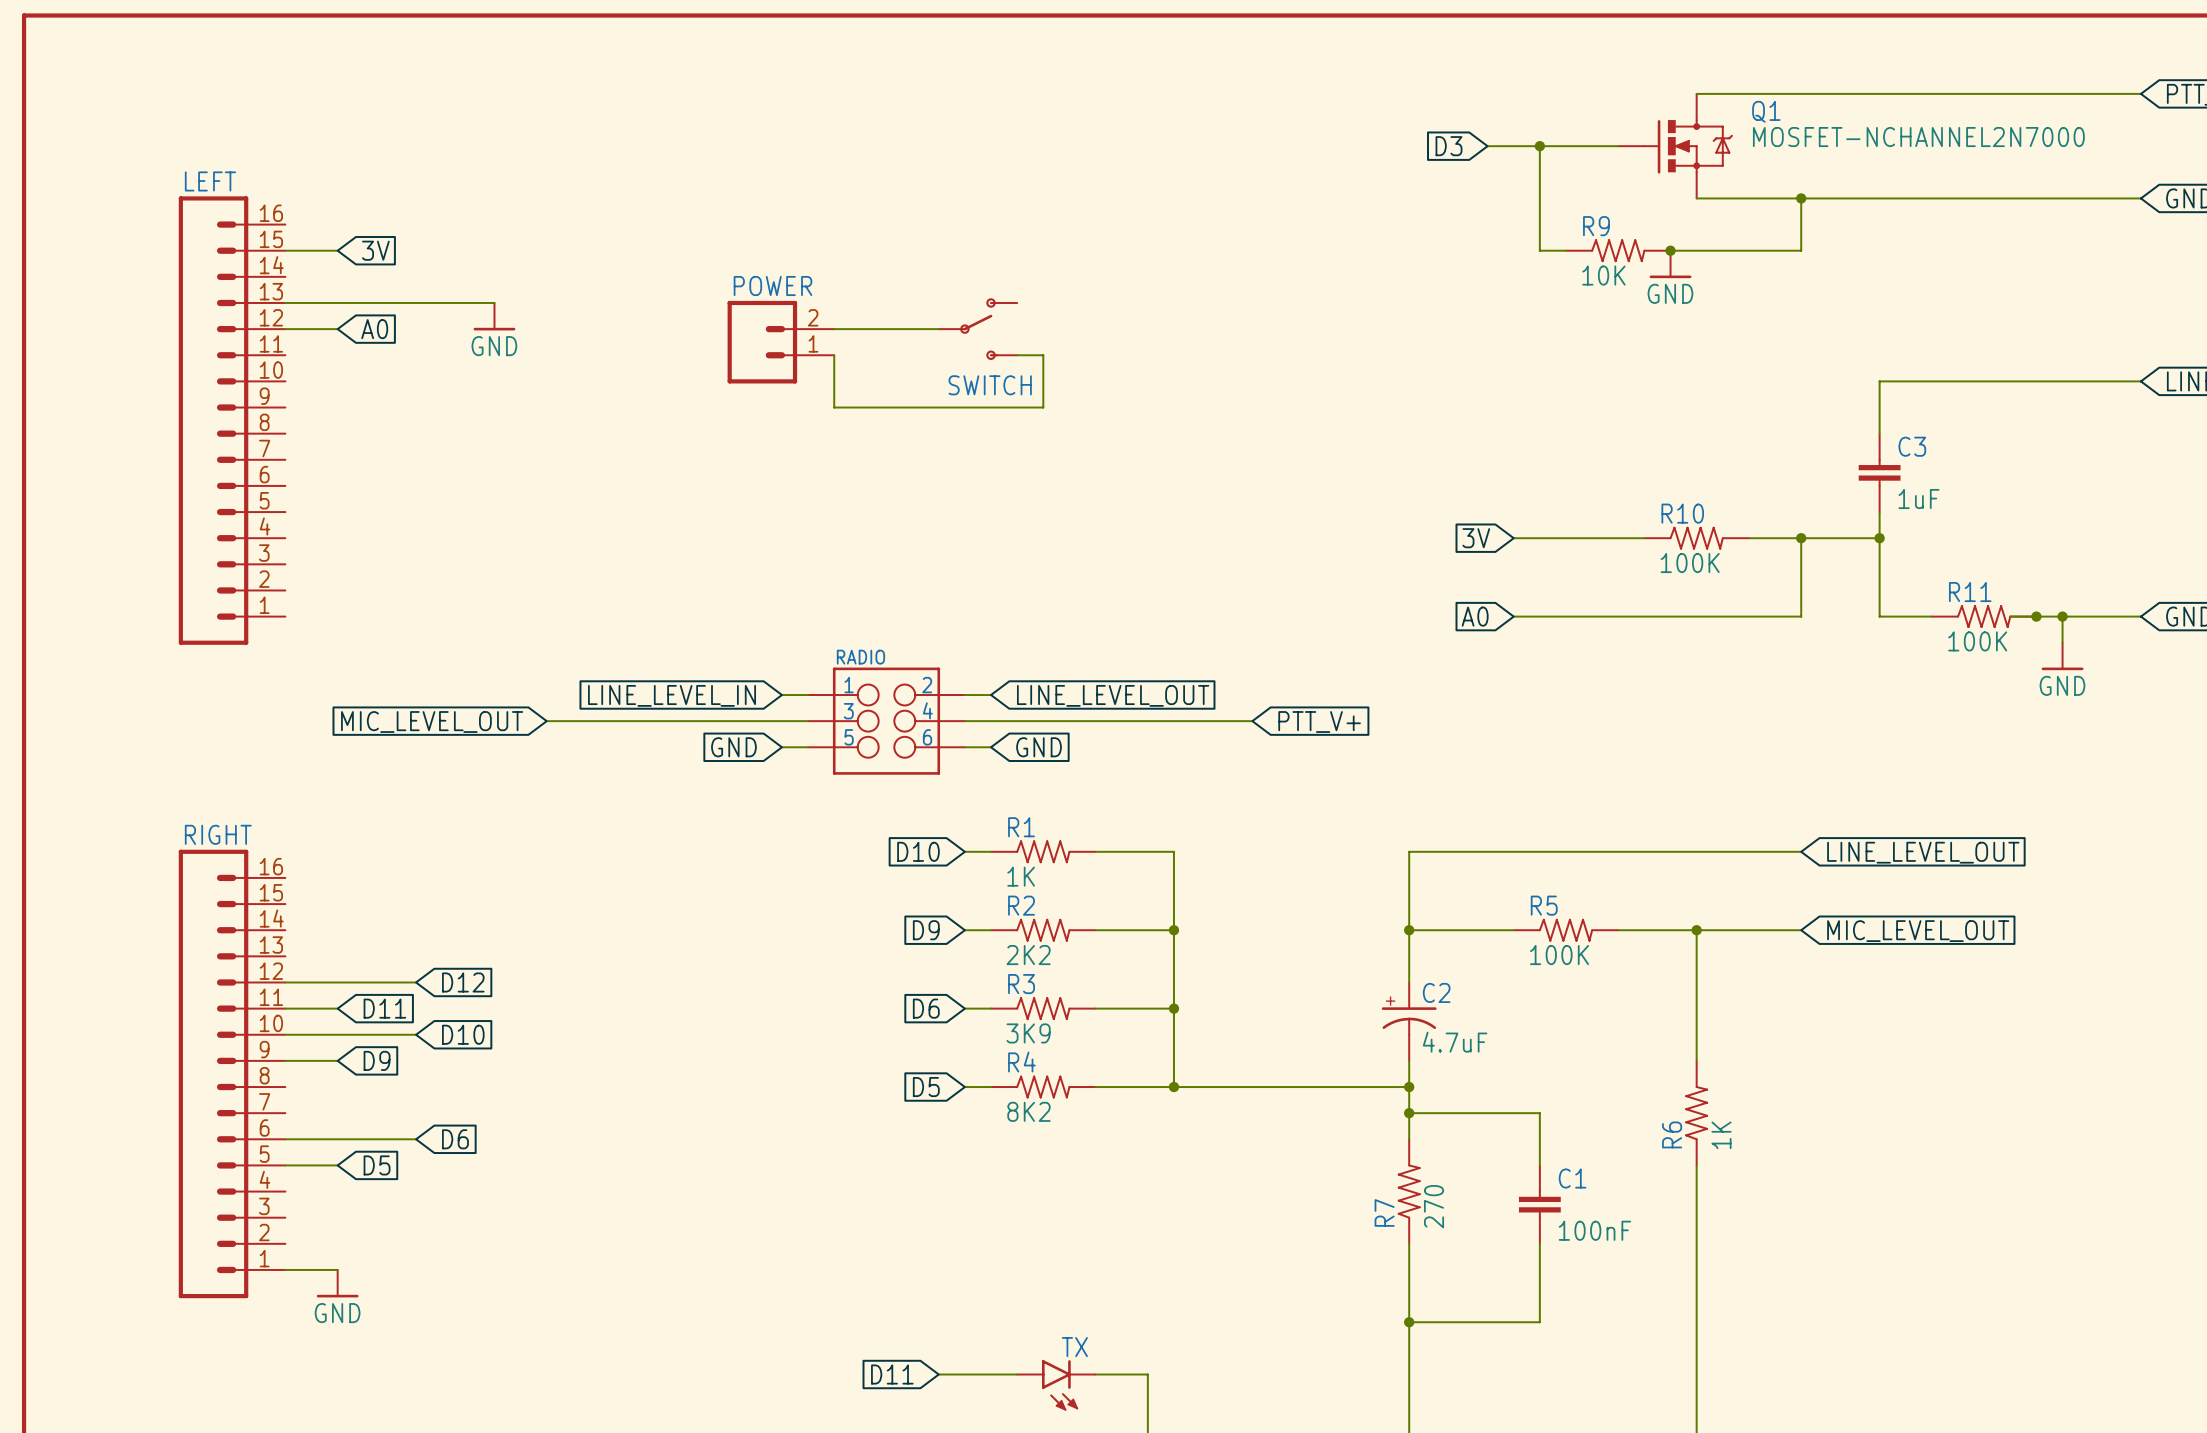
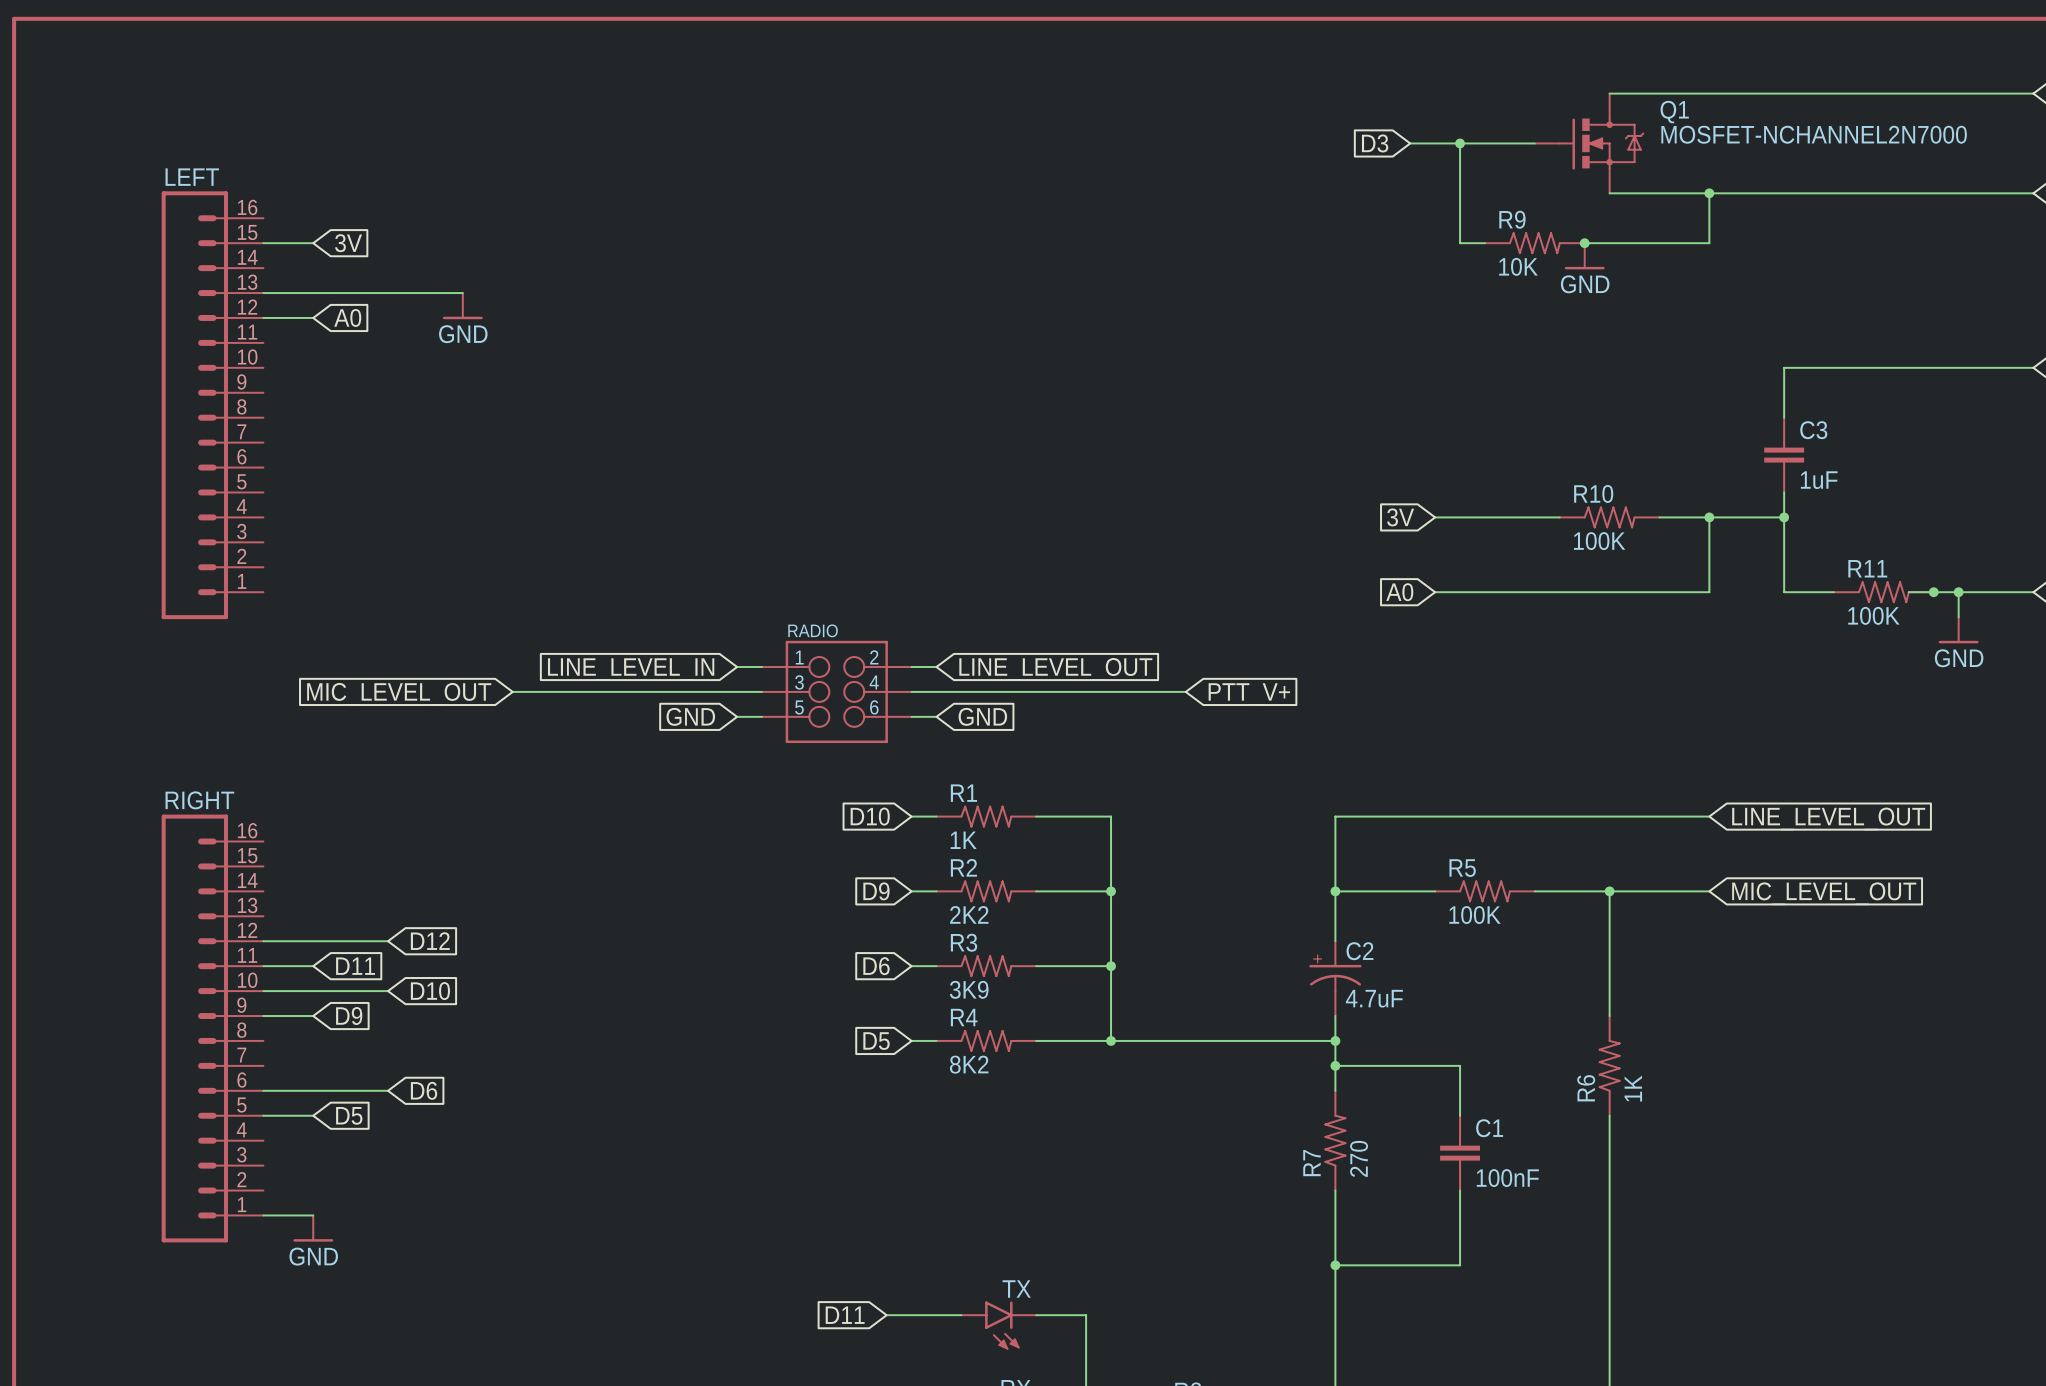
wire: (834, 329) (938, 329) -> none
SWITCH: (977, 329) -> none
POWER: (780, 342) -> none
wire: (834, 355) (834, 407) (1043, 407) (1043, 355) (1017, 355) -> none

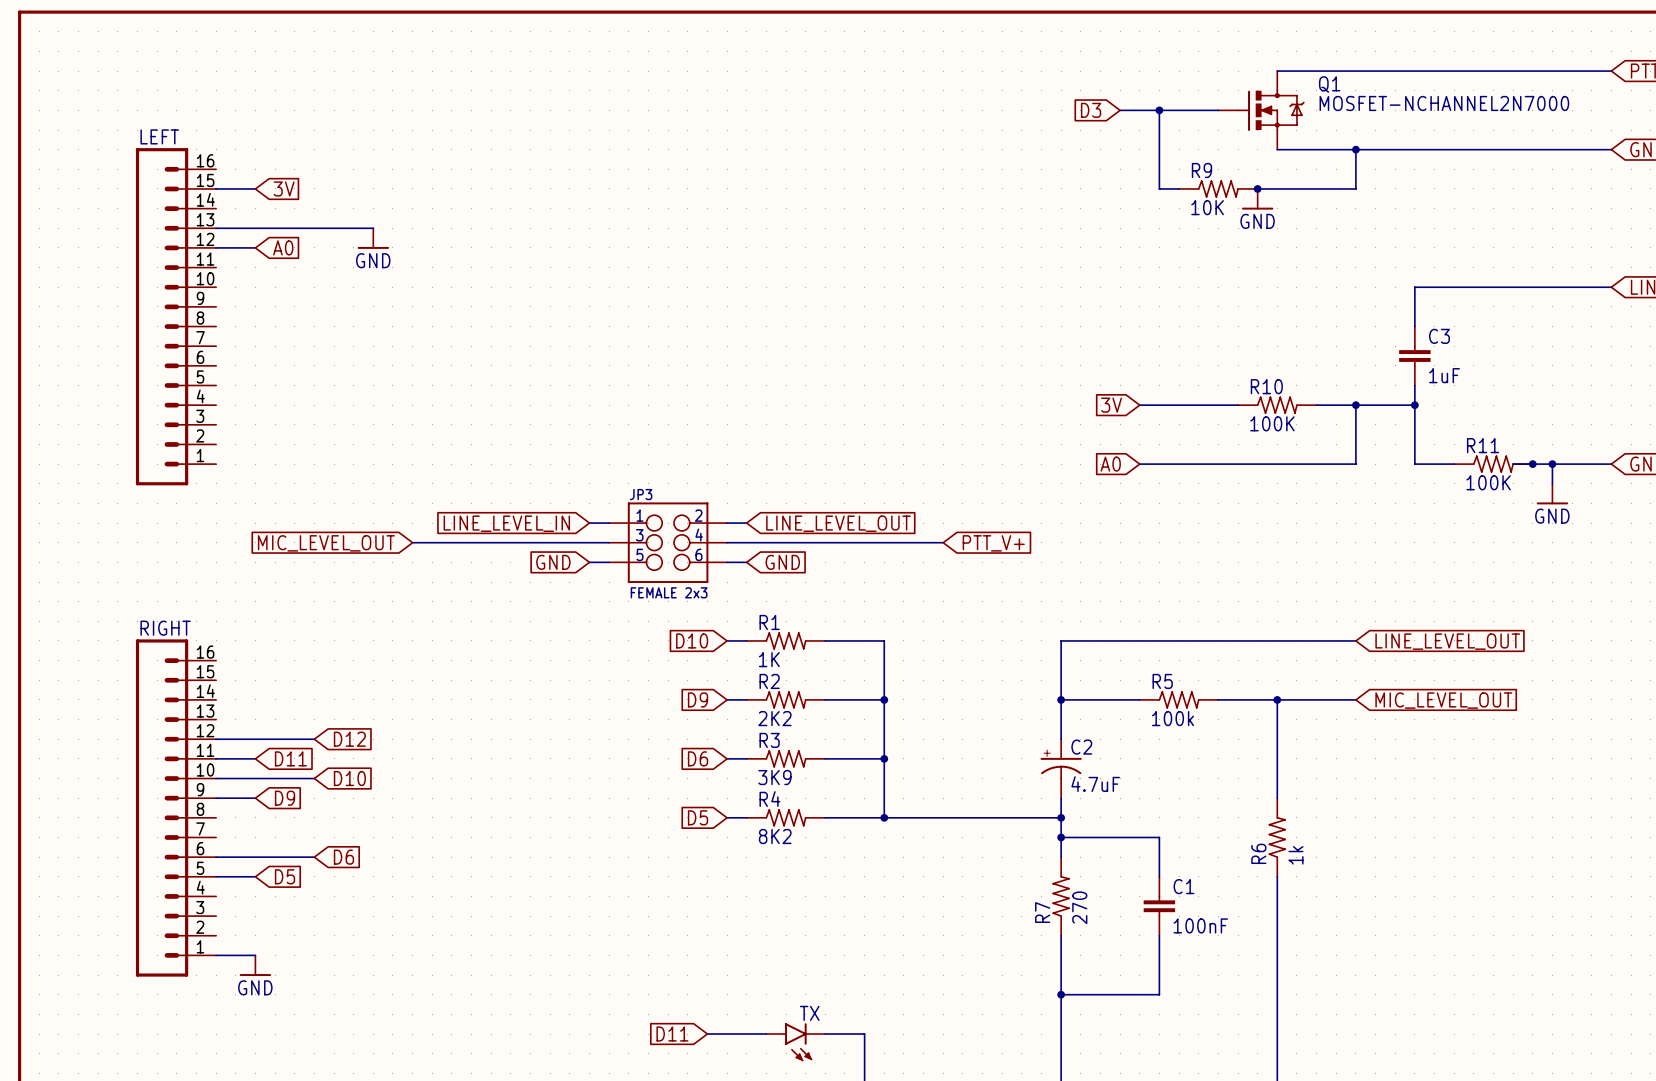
RADIO name: RADIO (813, 630) -> JP3 (641, 494)
RADIO value: none -> FEMALE 2x3 (669, 592)
R5 value: 100K (1474, 915) -> 100k (1172, 718)
R6 value: 1K (1633, 1088) -> 1k (1295, 855)

